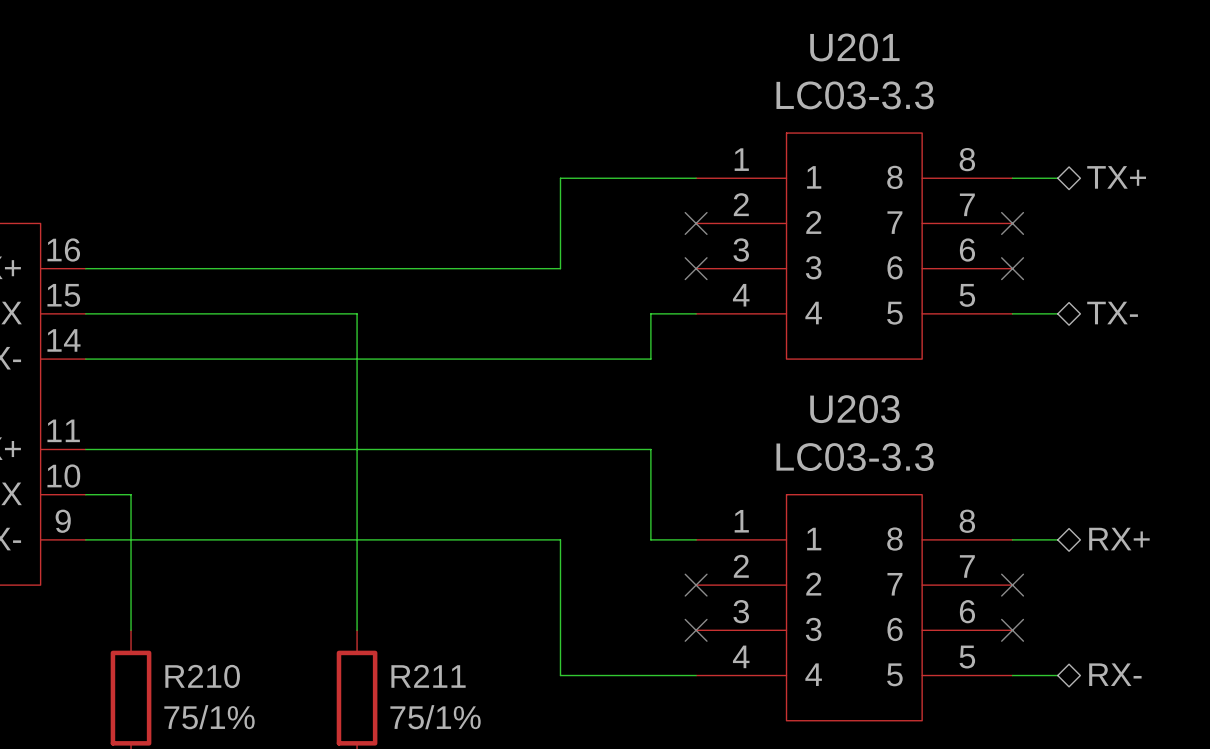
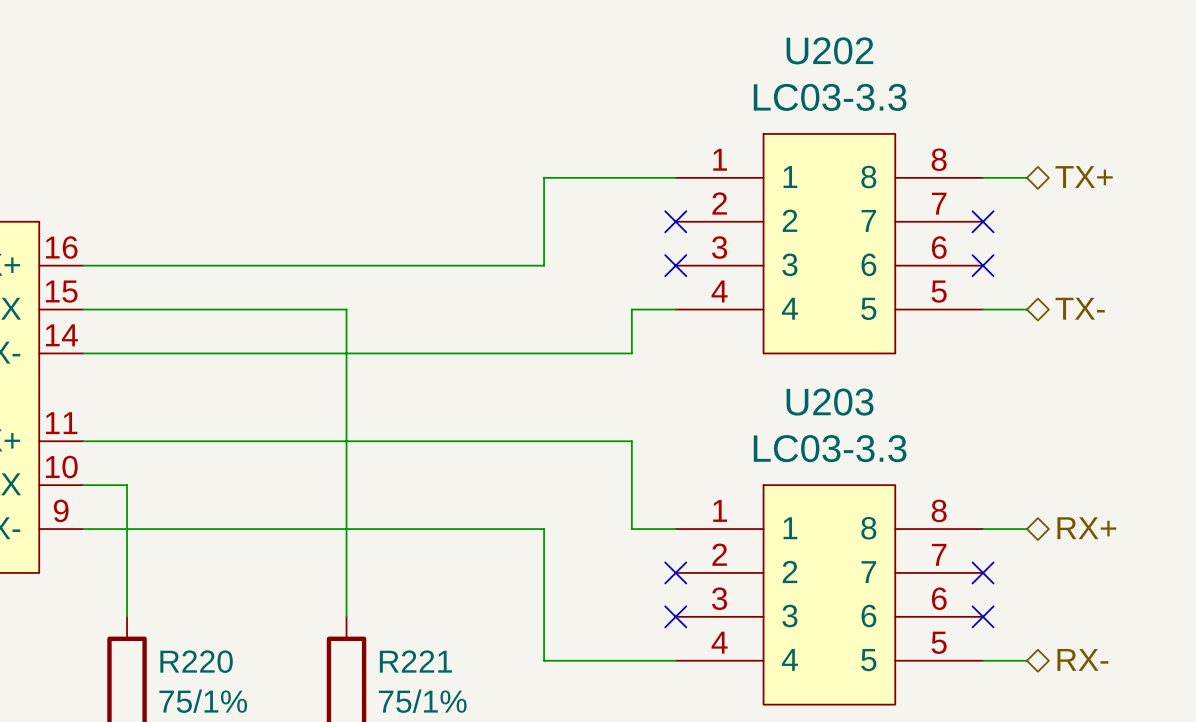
U201 name: U201 (854, 47) -> U202 (829, 50)
R210 name: R210 (202, 676) -> R220 (196, 661)
R211 name: R211 (428, 676) -> R221 (415, 661)

